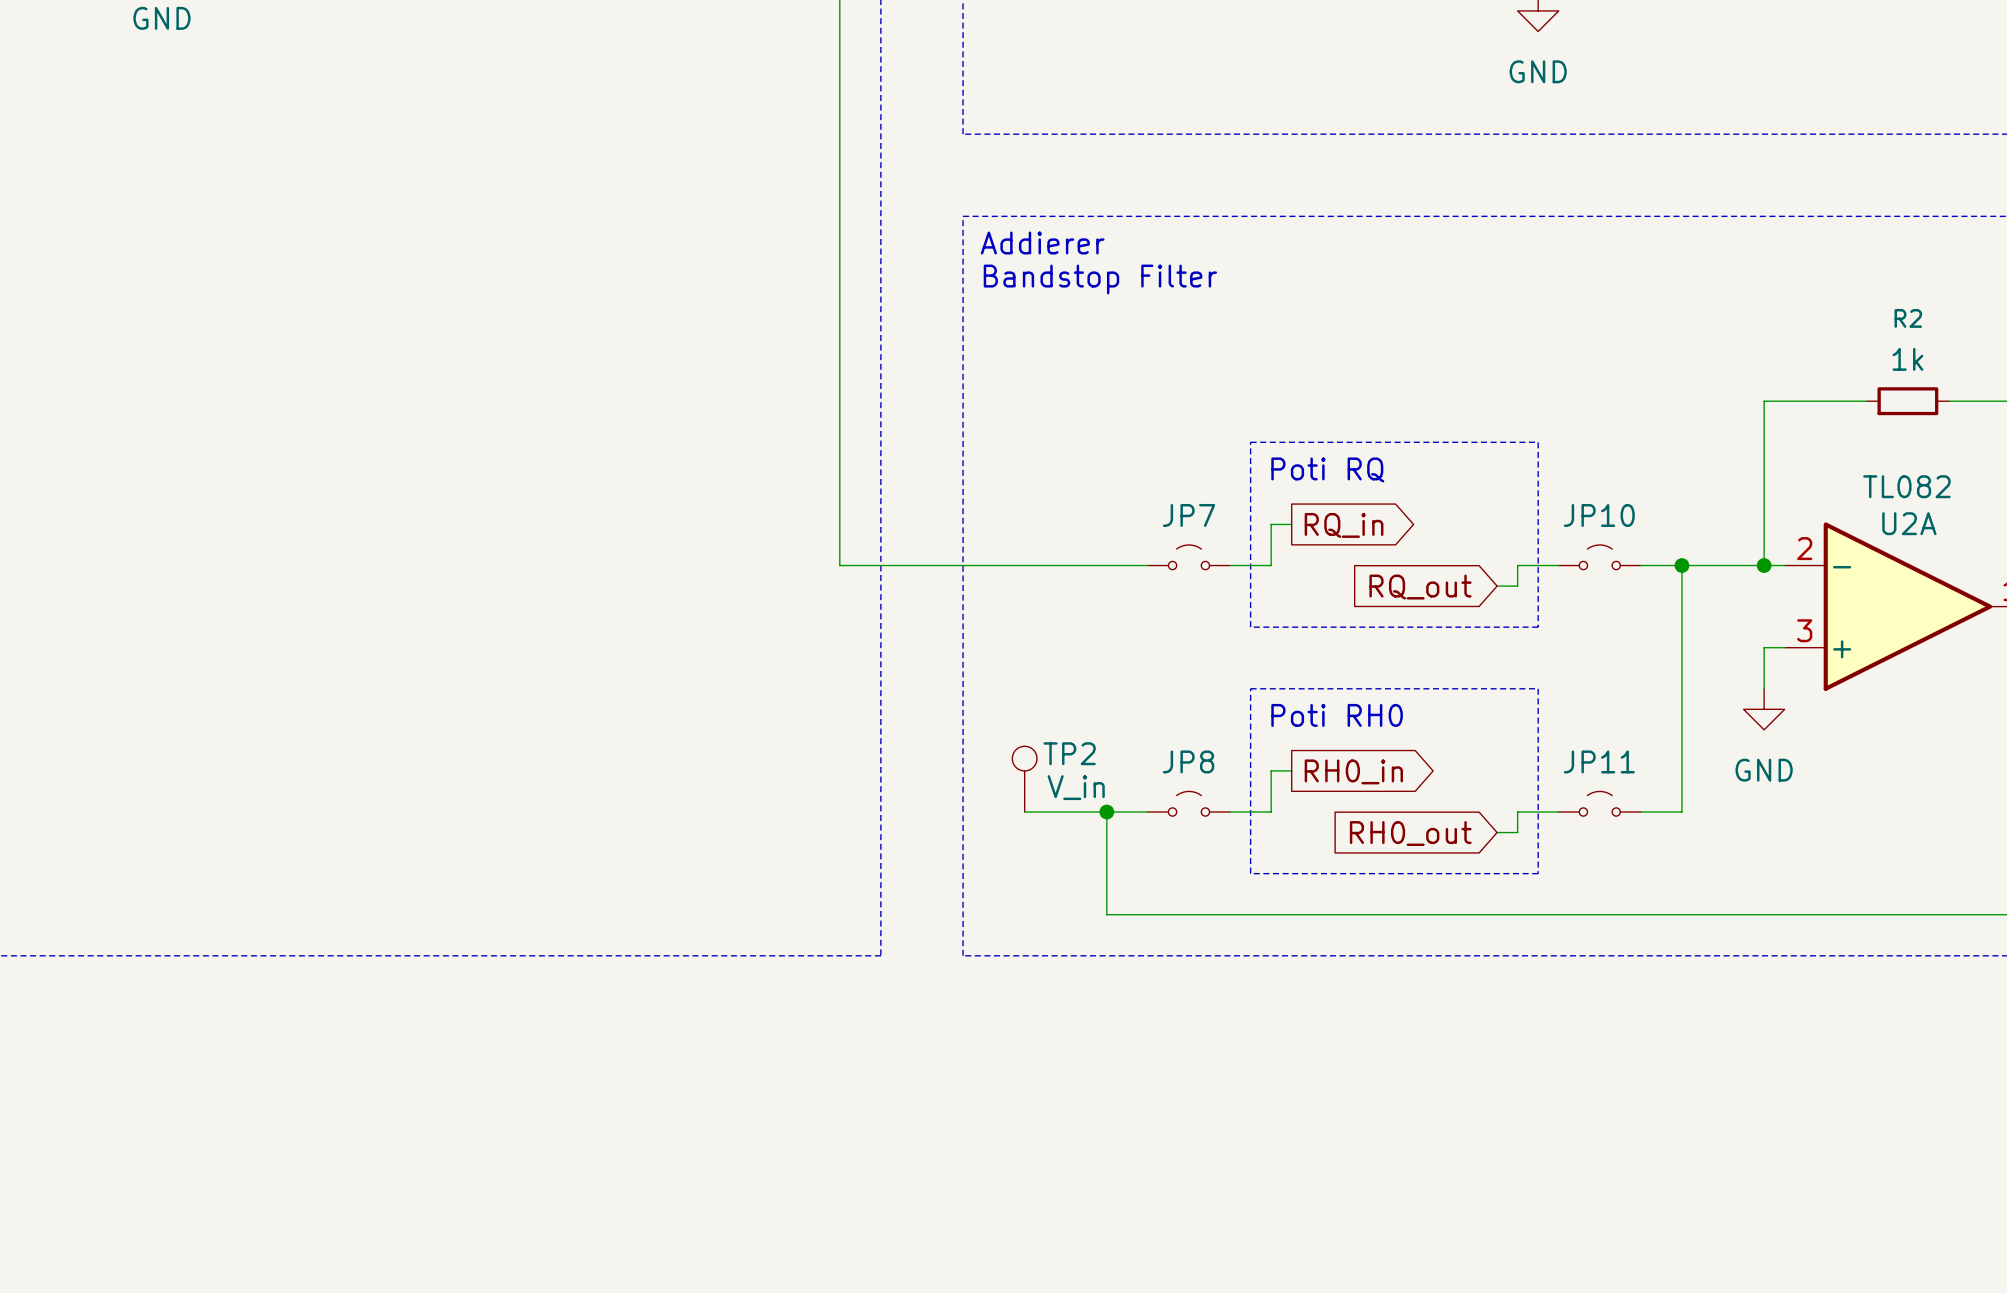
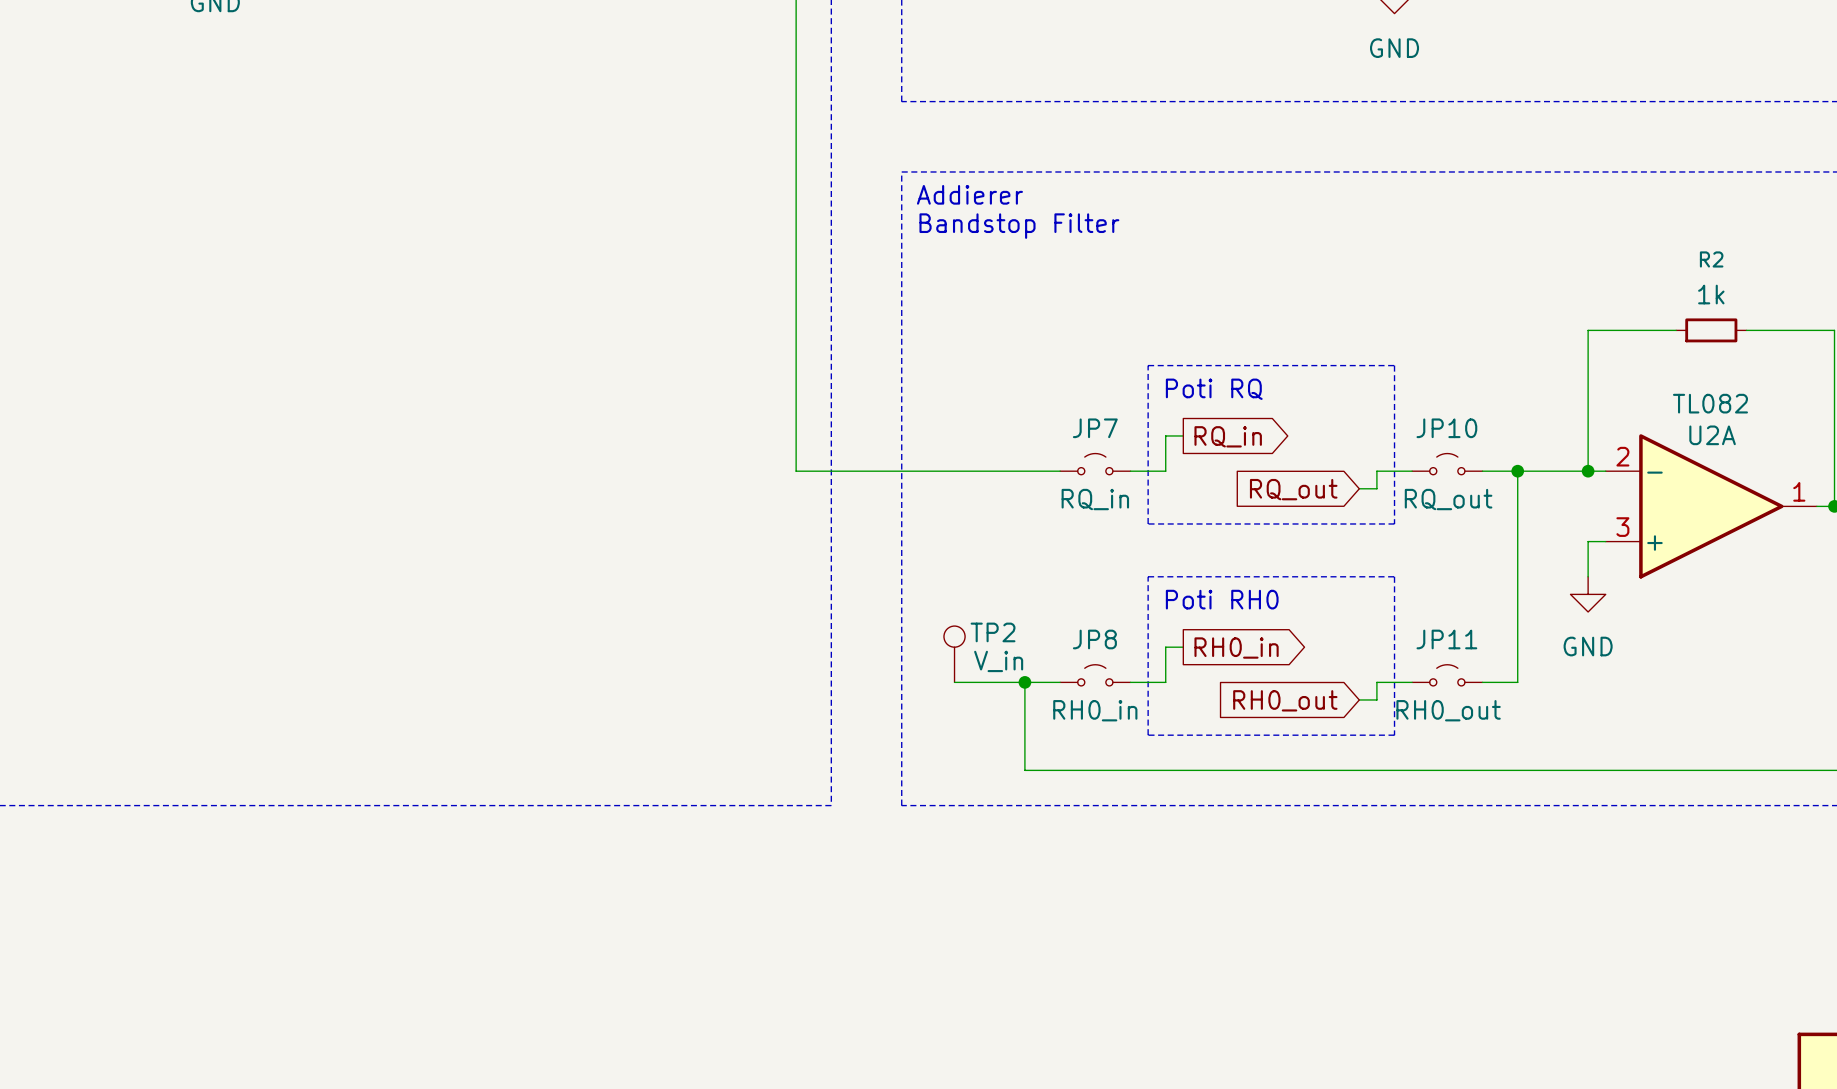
JP7 value: none -> RQ_in (1095, 499)
JP10 value: none -> RQ_out (1448, 499)
JP8 value: none -> RH0_in (1095, 710)
JP11 value: none -> RH0_out (1448, 710)

